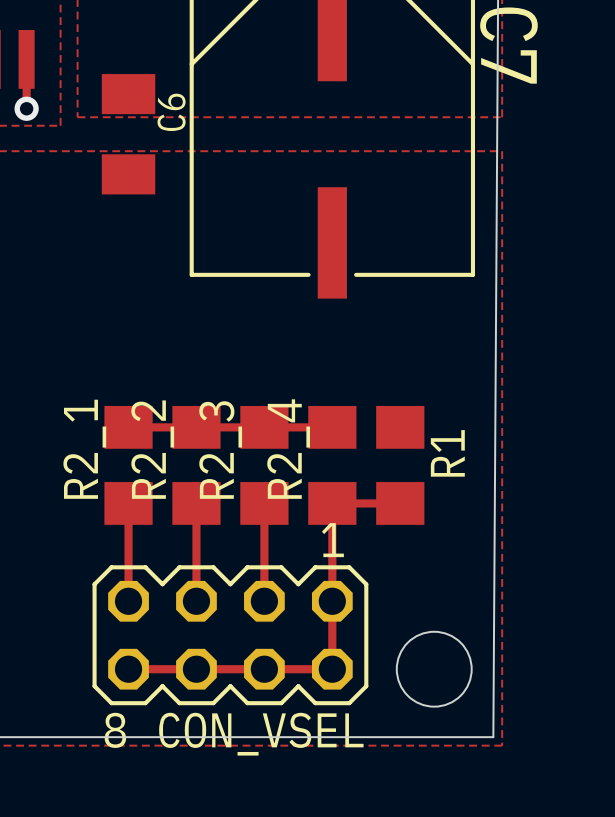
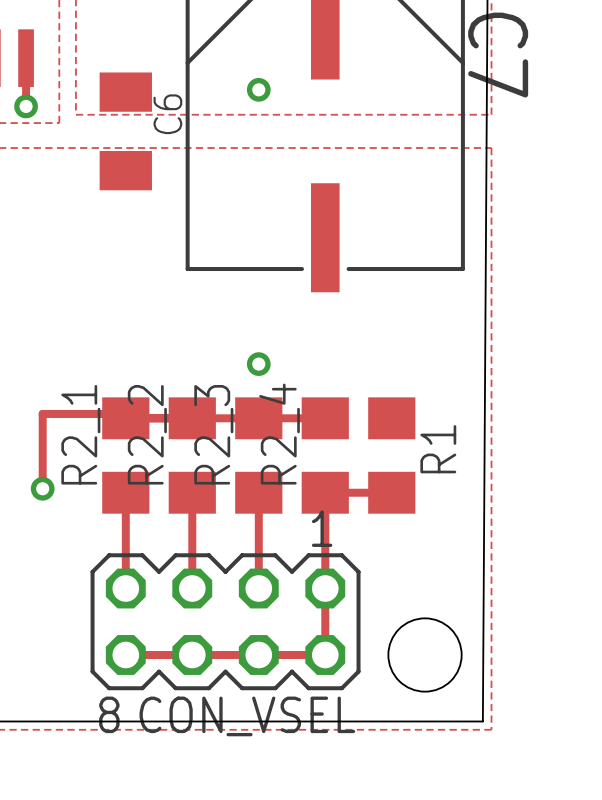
via: none -> (258, 89)
via: none -> (258, 364)
track: none -> (125, 418) (125, 413) (42, 413) (42, 488)
via: none -> (42, 488)

